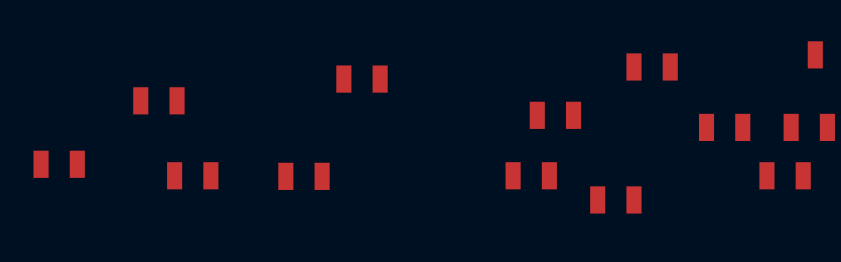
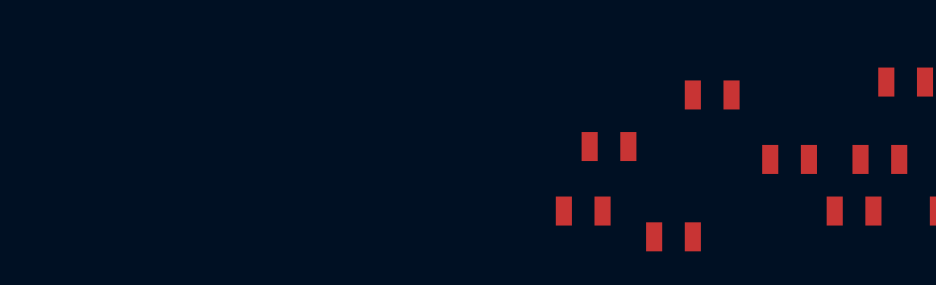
part: (361, 79) -> none
part: (158, 100) -> none
part: (59, 164) -> none
part: (192, 175) -> none
part: (303, 176) -> none

